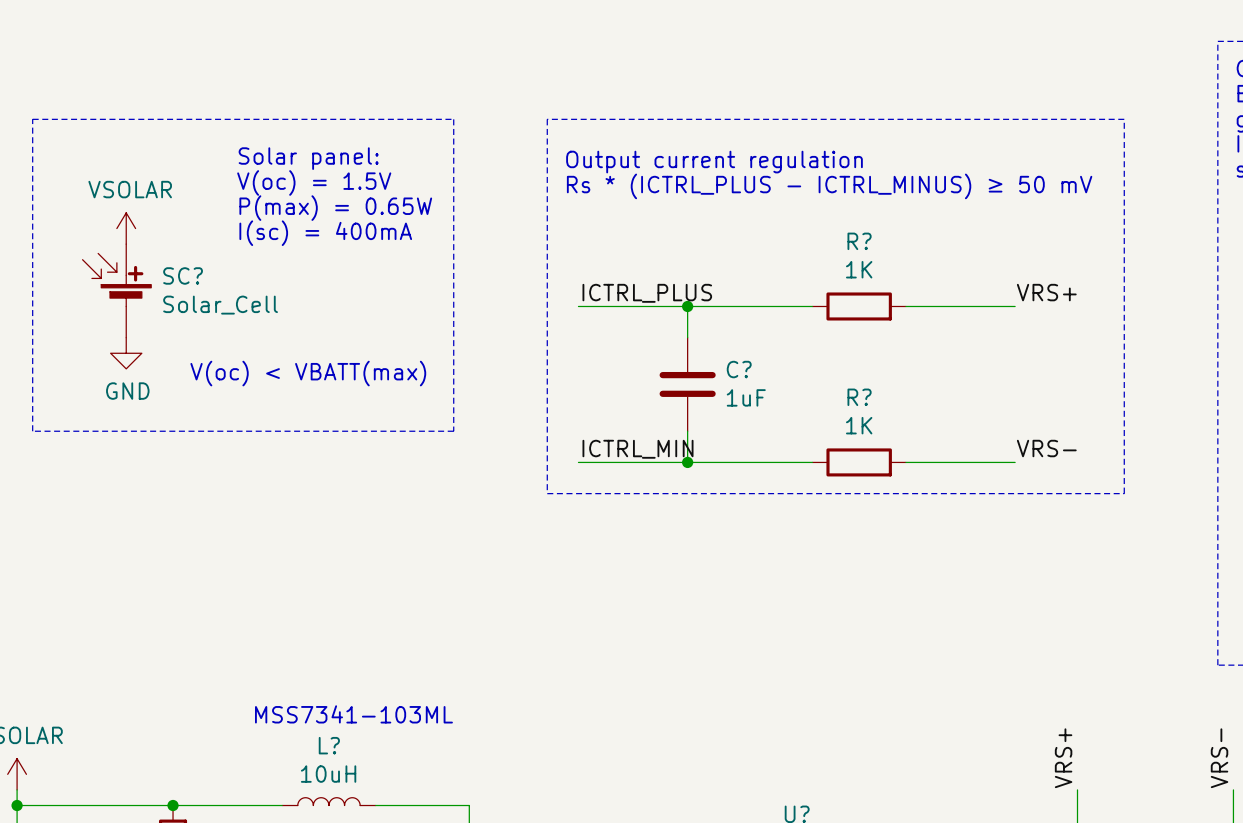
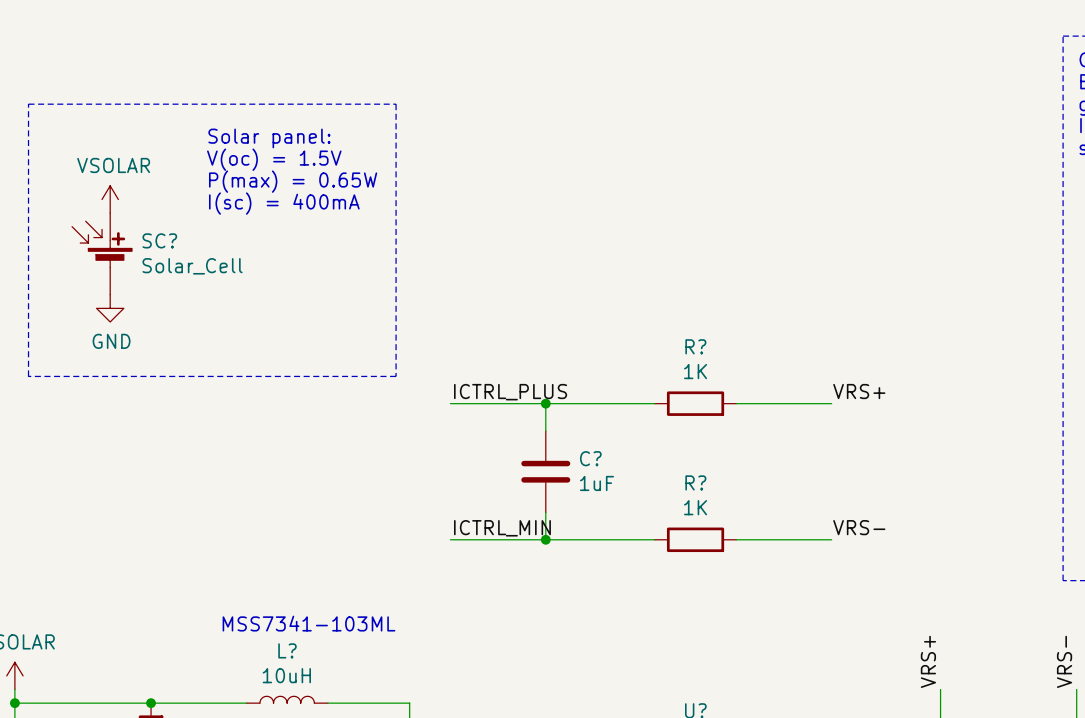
line: (547, 119) (1124, 119) (1124, 493) (547, 493) (547, 119) -> none
text: Output current regulation (714, 162) -> none
text: Rs * (ICTRL_PLUS - ICTRL_MINUS) ≥ 50 mV (829, 186) -> none
label position: VRS+ (1046, 292) -> VRS+ (859, 391)
label position: ICTRL_PLUS (647, 293) -> ICTRL_PLUS (510, 392)
wire: (578, 306) (812, 306) -> none
wire: (687, 306) (687, 337) -> (545, 403) (545, 430)
junction: (687, 306) -> none
R?: 1K (859, 306) -> none
wire: (905, 306) (1015, 306) -> none
text: V(oc) < VBATT(max) (308, 373) -> none
C? position: (687, 384) -> (545, 471)
wire: (687, 431) (687, 462) -> (545, 512) (545, 539)
label position: VRS- (1046, 448) -> VRS- (859, 527)
label position: ICTRL_MIN (638, 449) -> ICTRL_MIN (502, 528)
wire: none -> (450, 403) (504, 403)
junction position: (687, 462) -> (545, 403)
wire: (750, 462) (812, 462) -> (736, 403) (790, 403)
R? position: (859, 462) -> (695, 403)
wire: (952, 462) (1015, 462) -> none
wire: none -> (450, 539) (654, 539)
junction: none -> (545, 539)
R?: none -> 1K (695, 539)
wire: none -> (736, 539) (831, 539)

